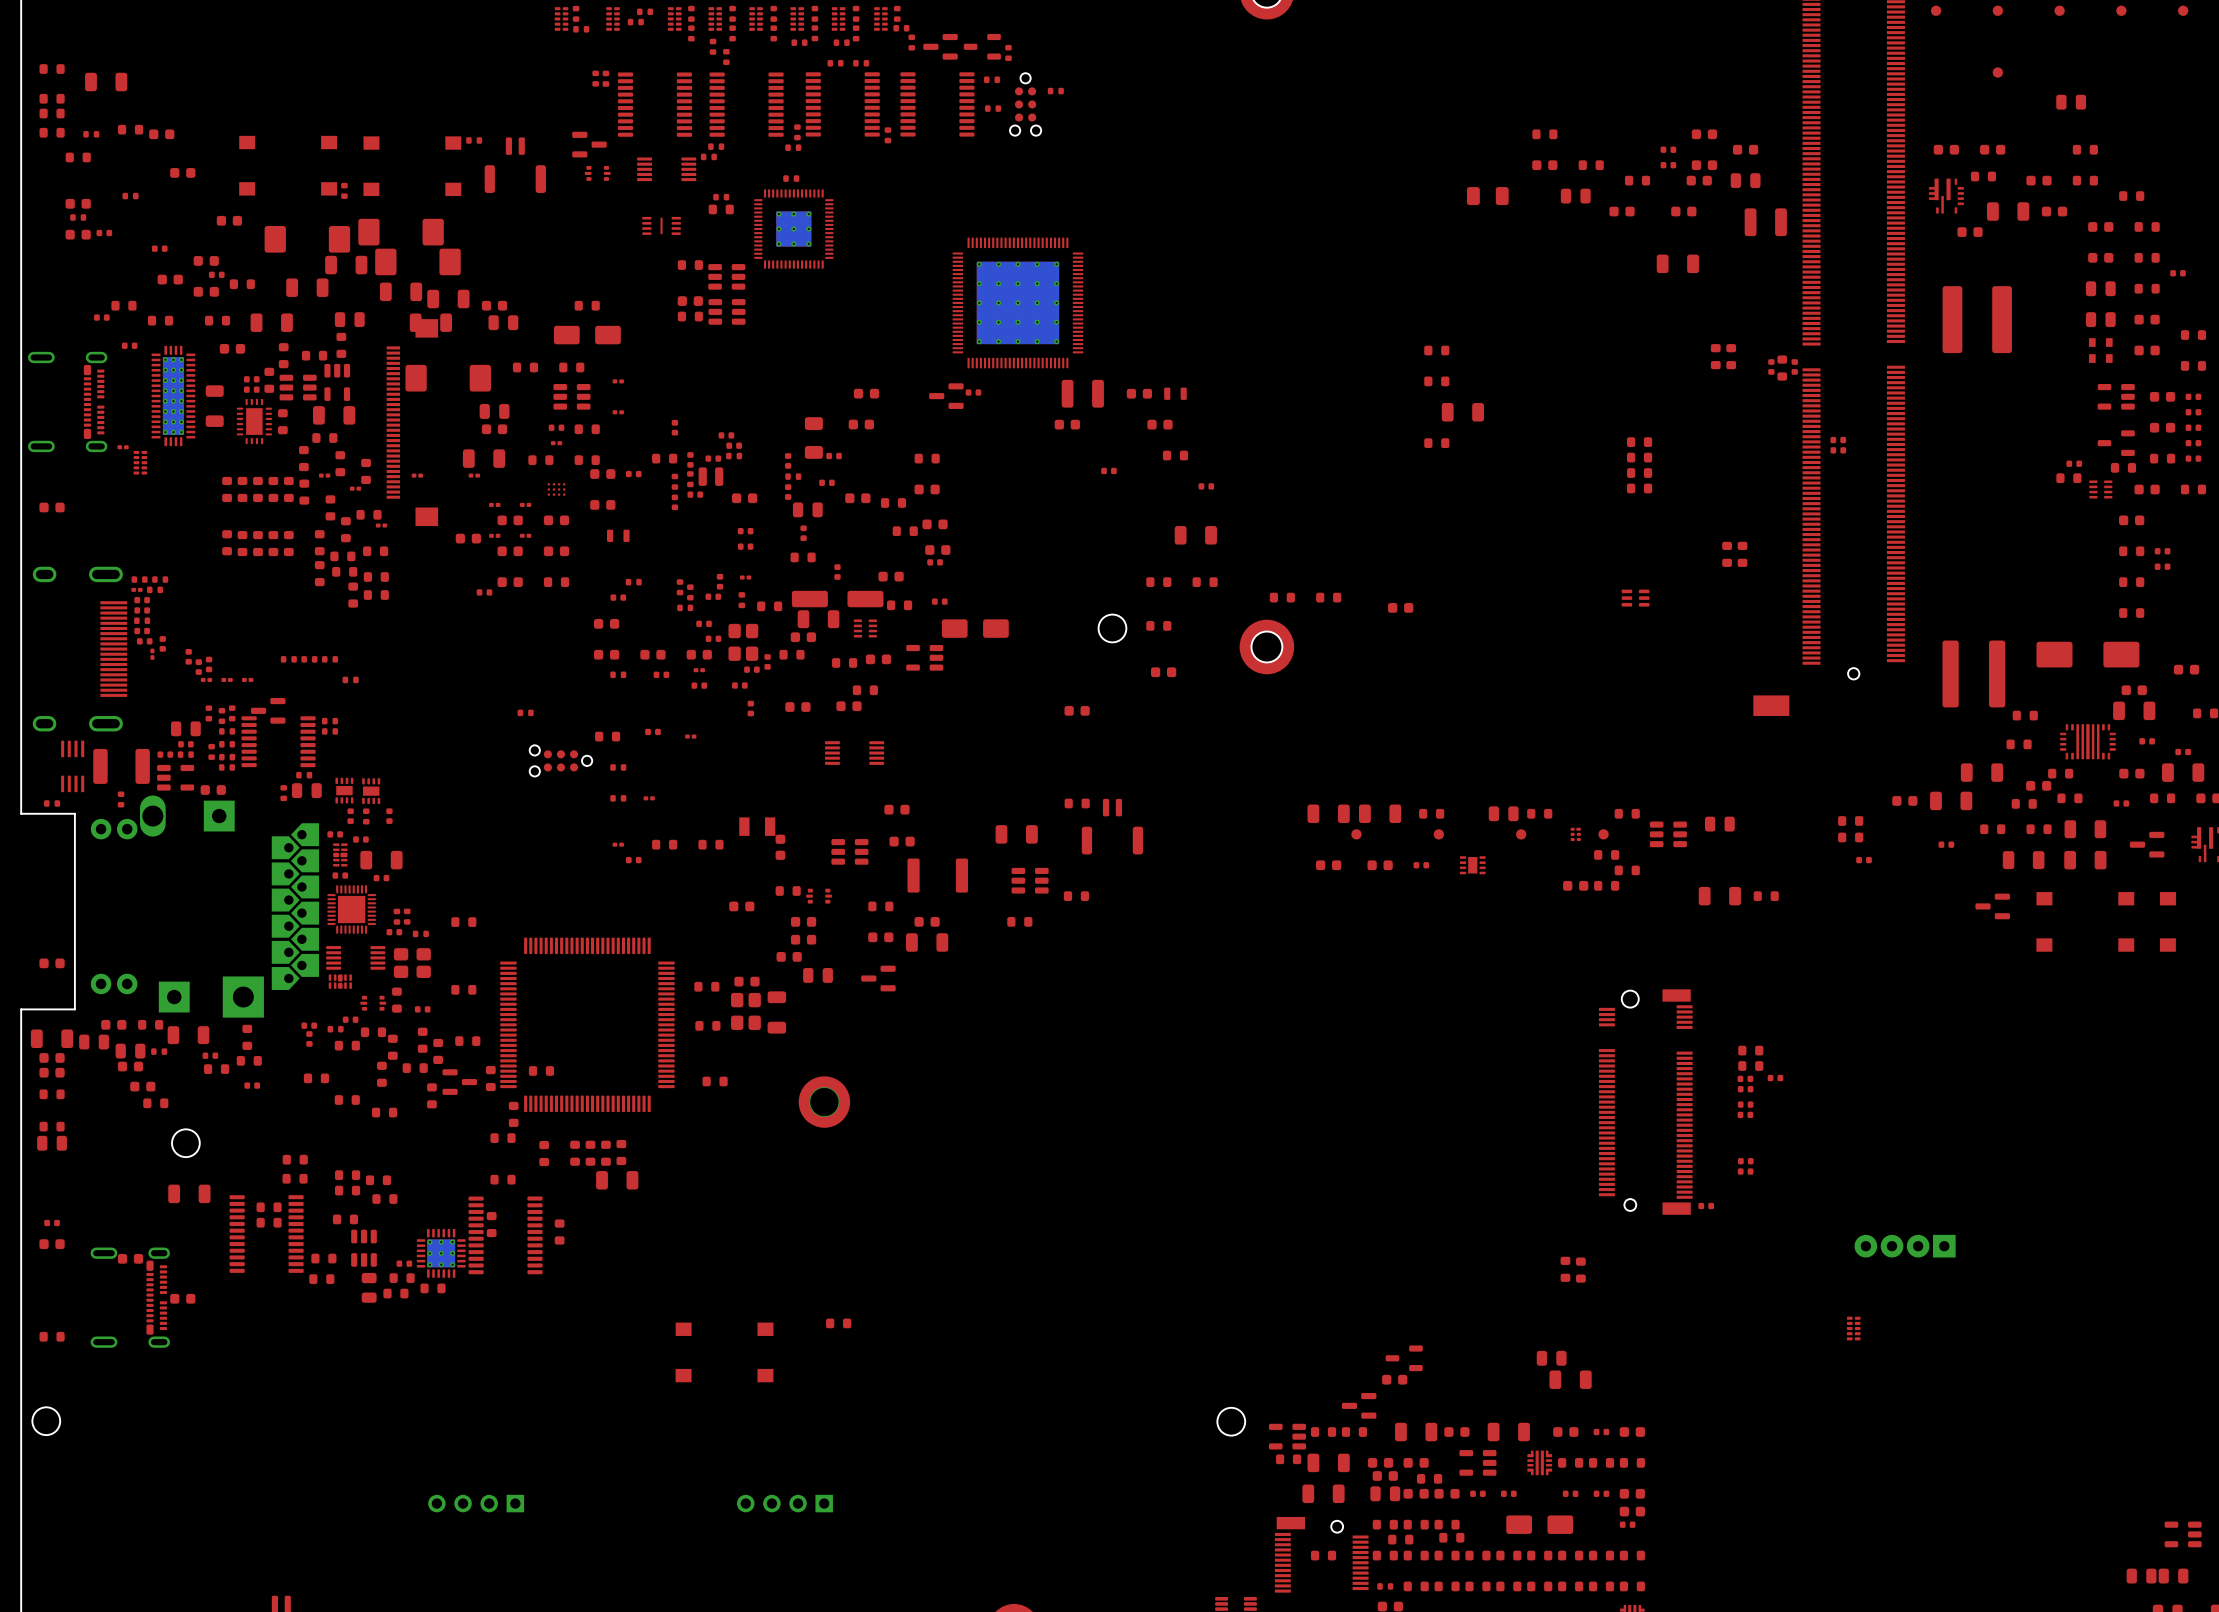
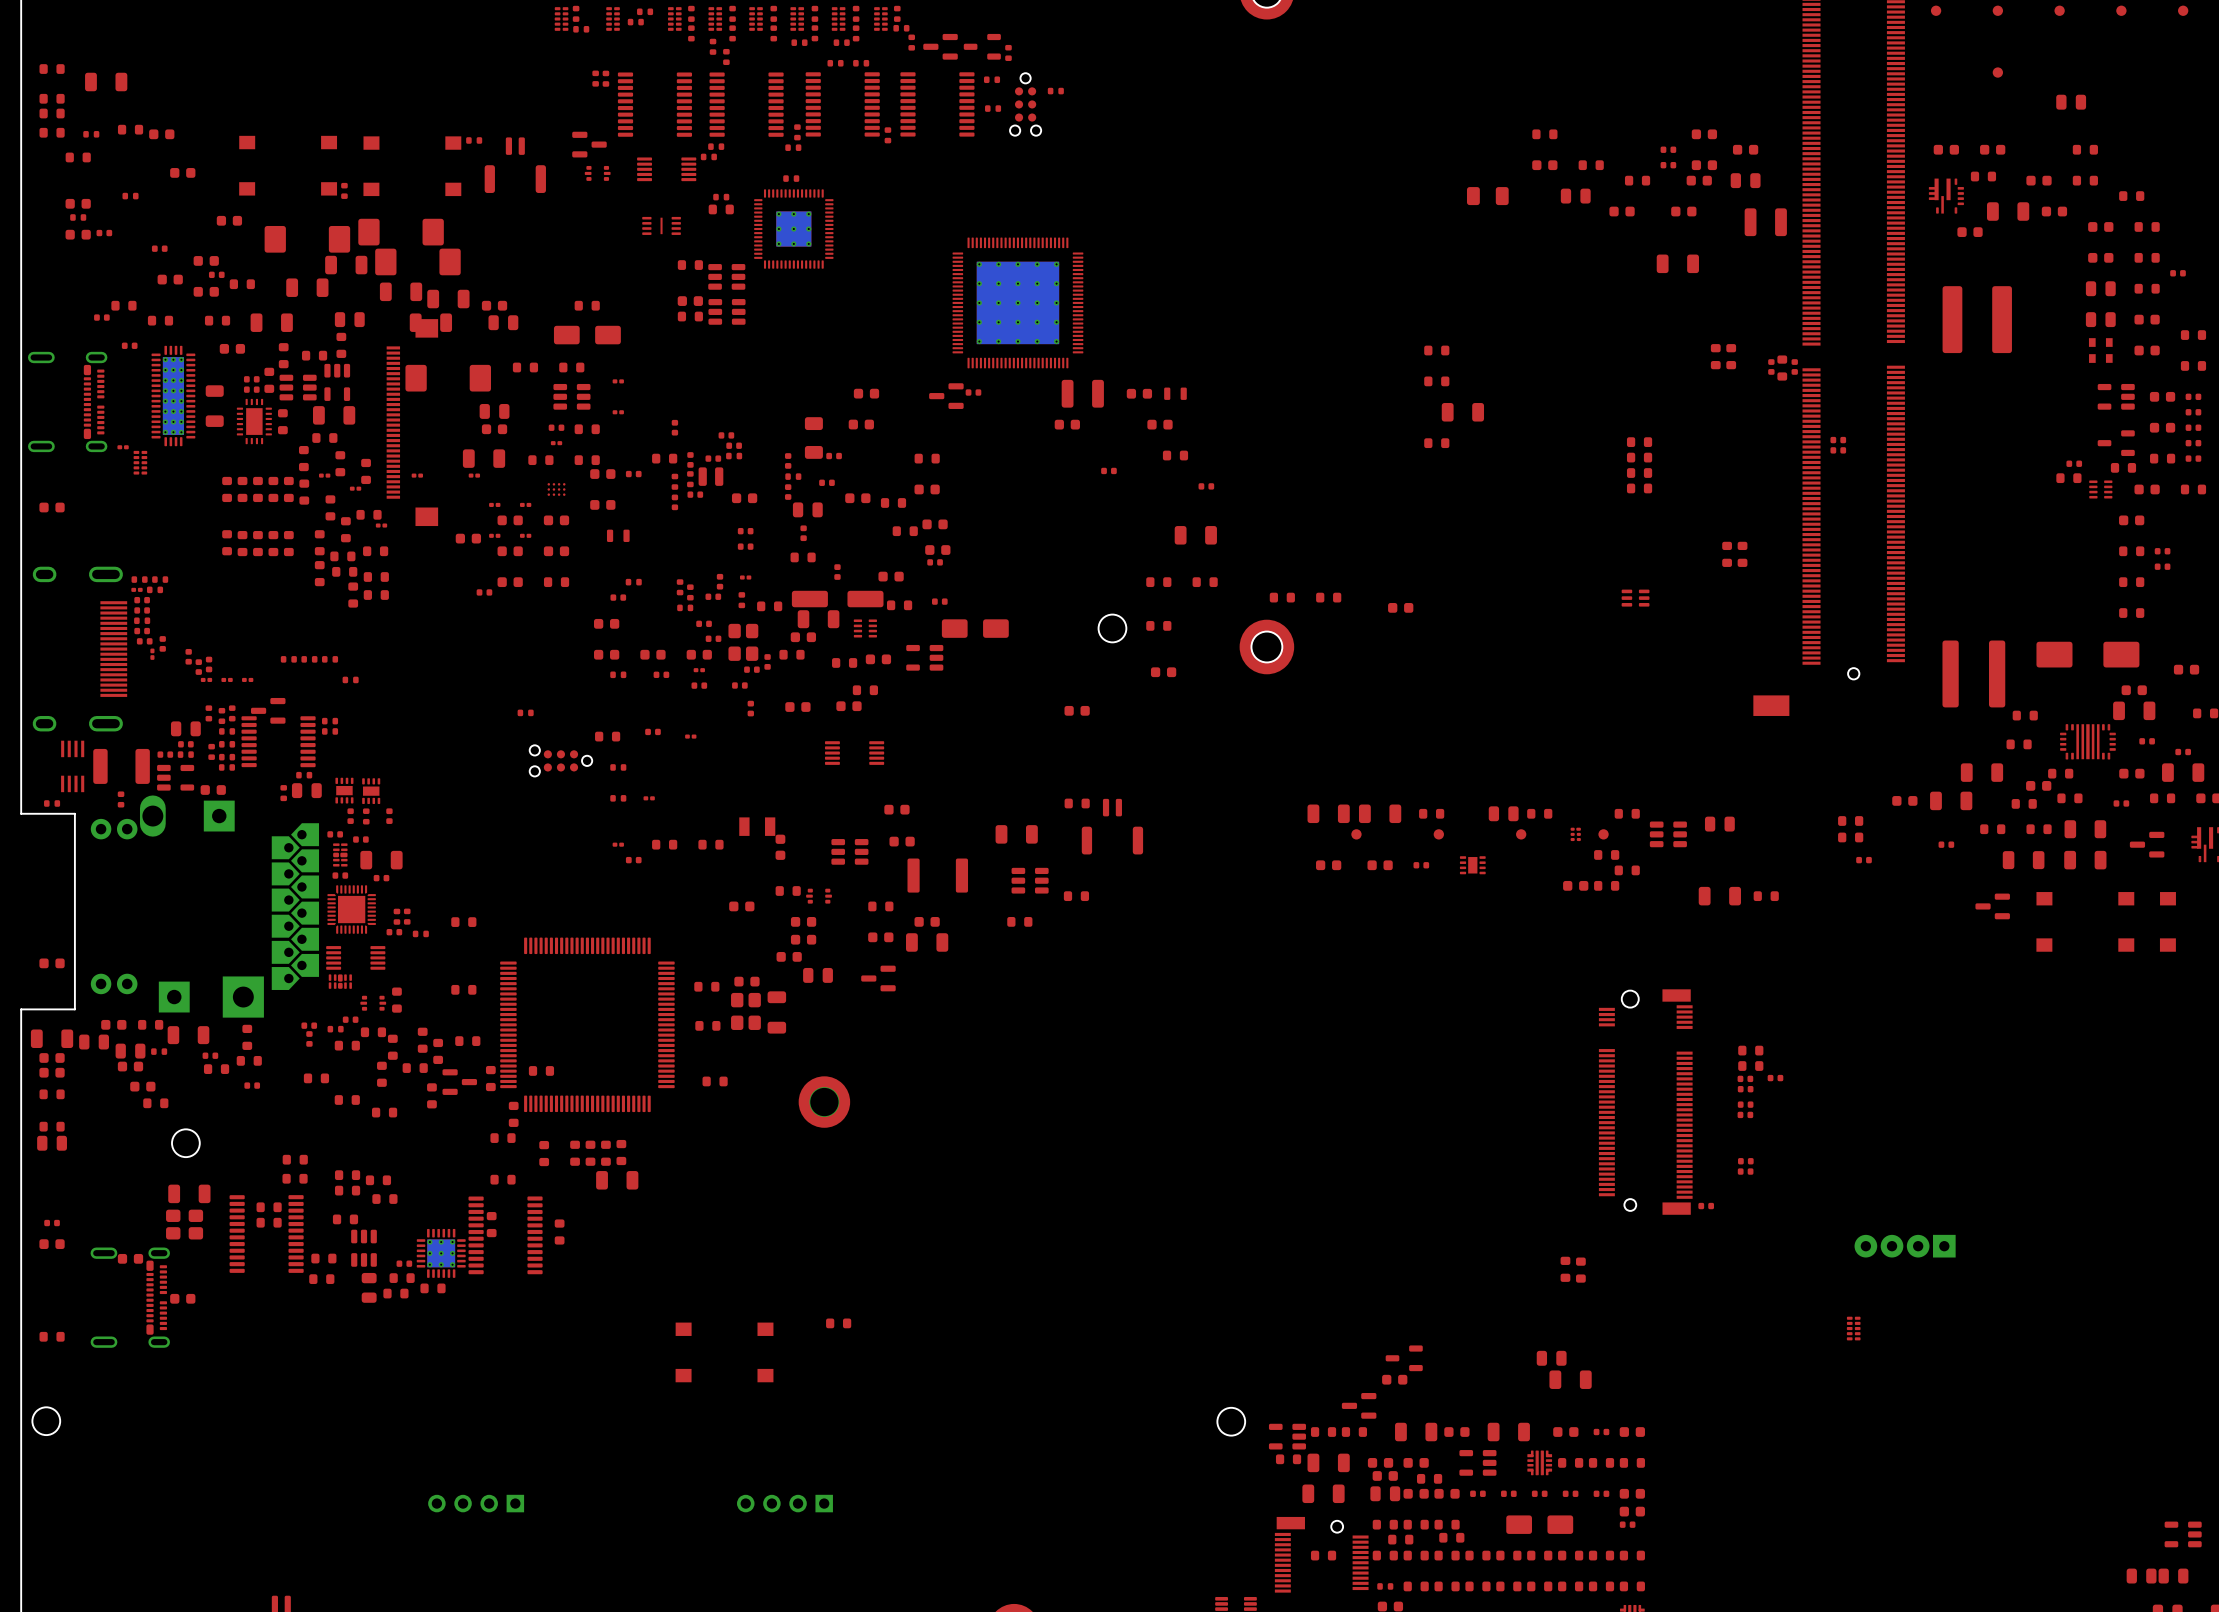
part: (412, 963) -> none
part: (422, 1009) -> none
part: none -> (184, 1224)
part: none -> (1539, 1493)

